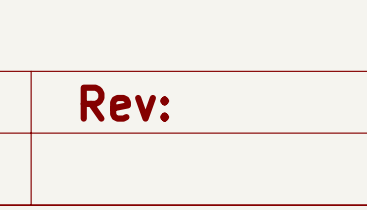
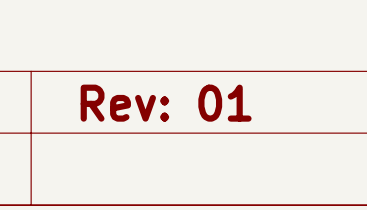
title block: Rev: (124, 103) -> Rev: 01 (166, 103)

